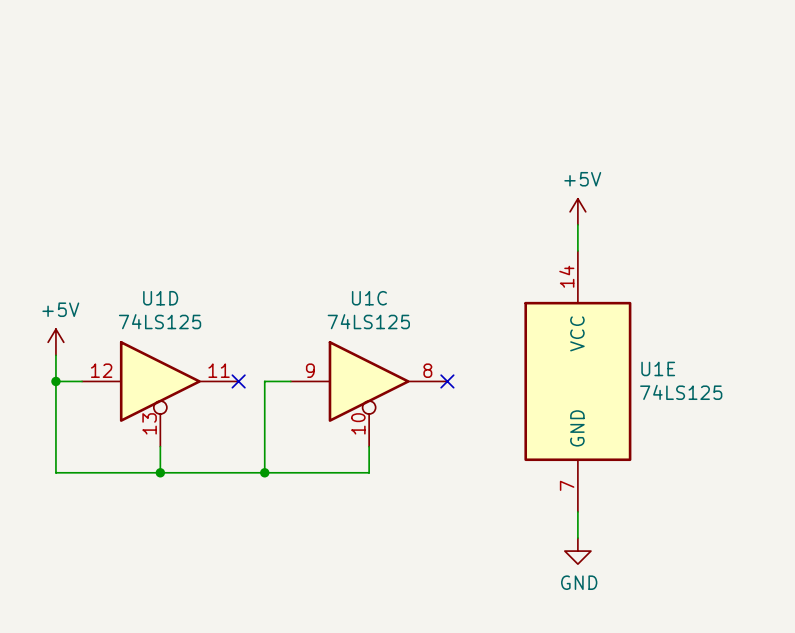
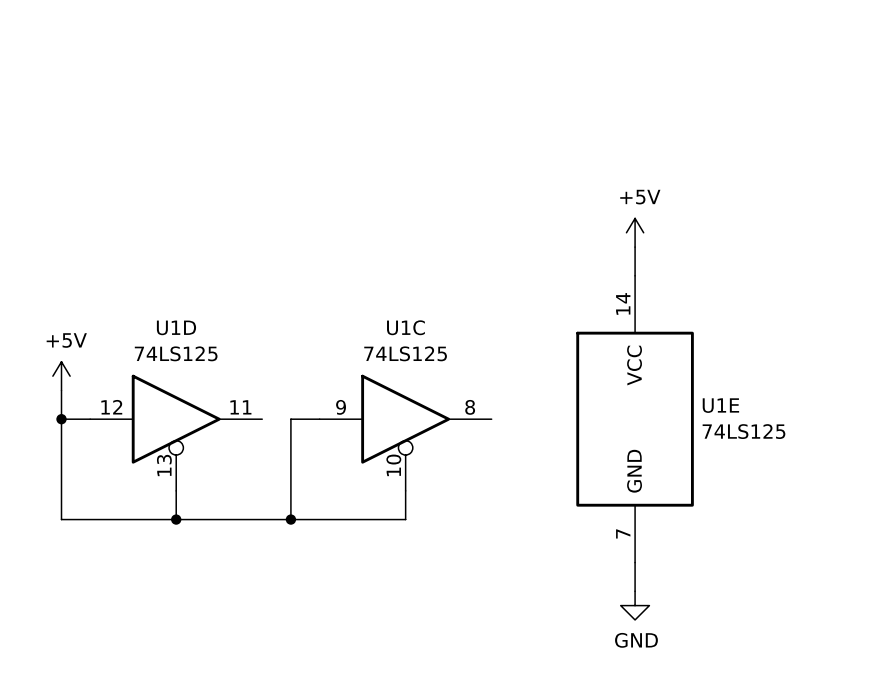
no-connect mark: (238, 381) -> none
no-connect mark: (447, 381) -> none

